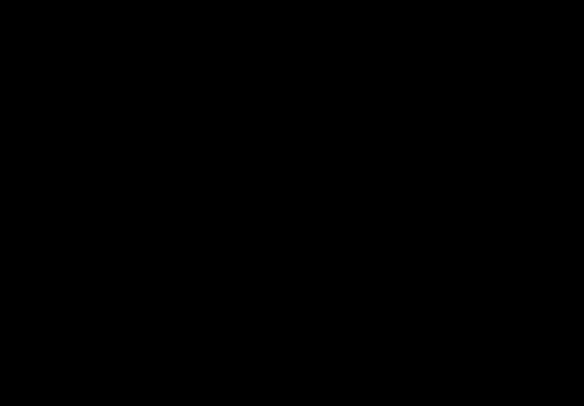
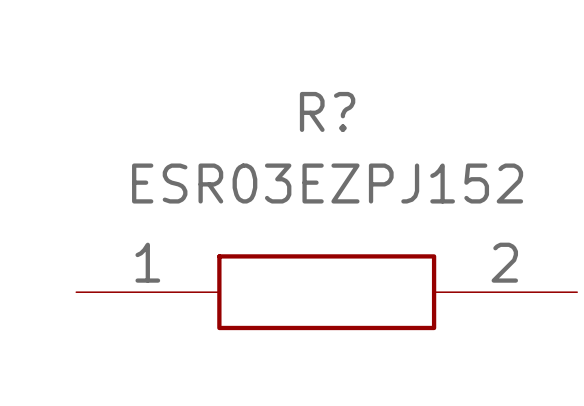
R?: none -> ESR03EZPJ152 (326, 292)

